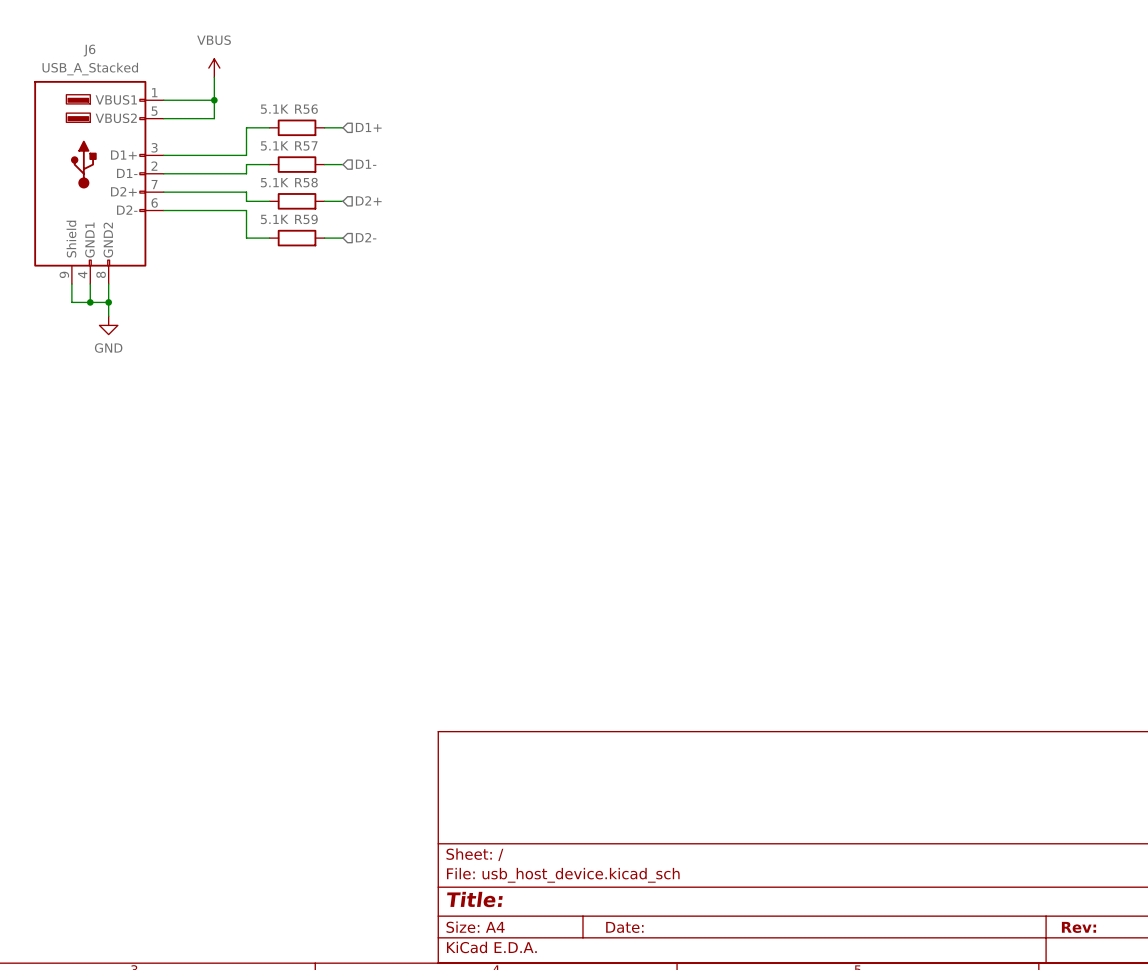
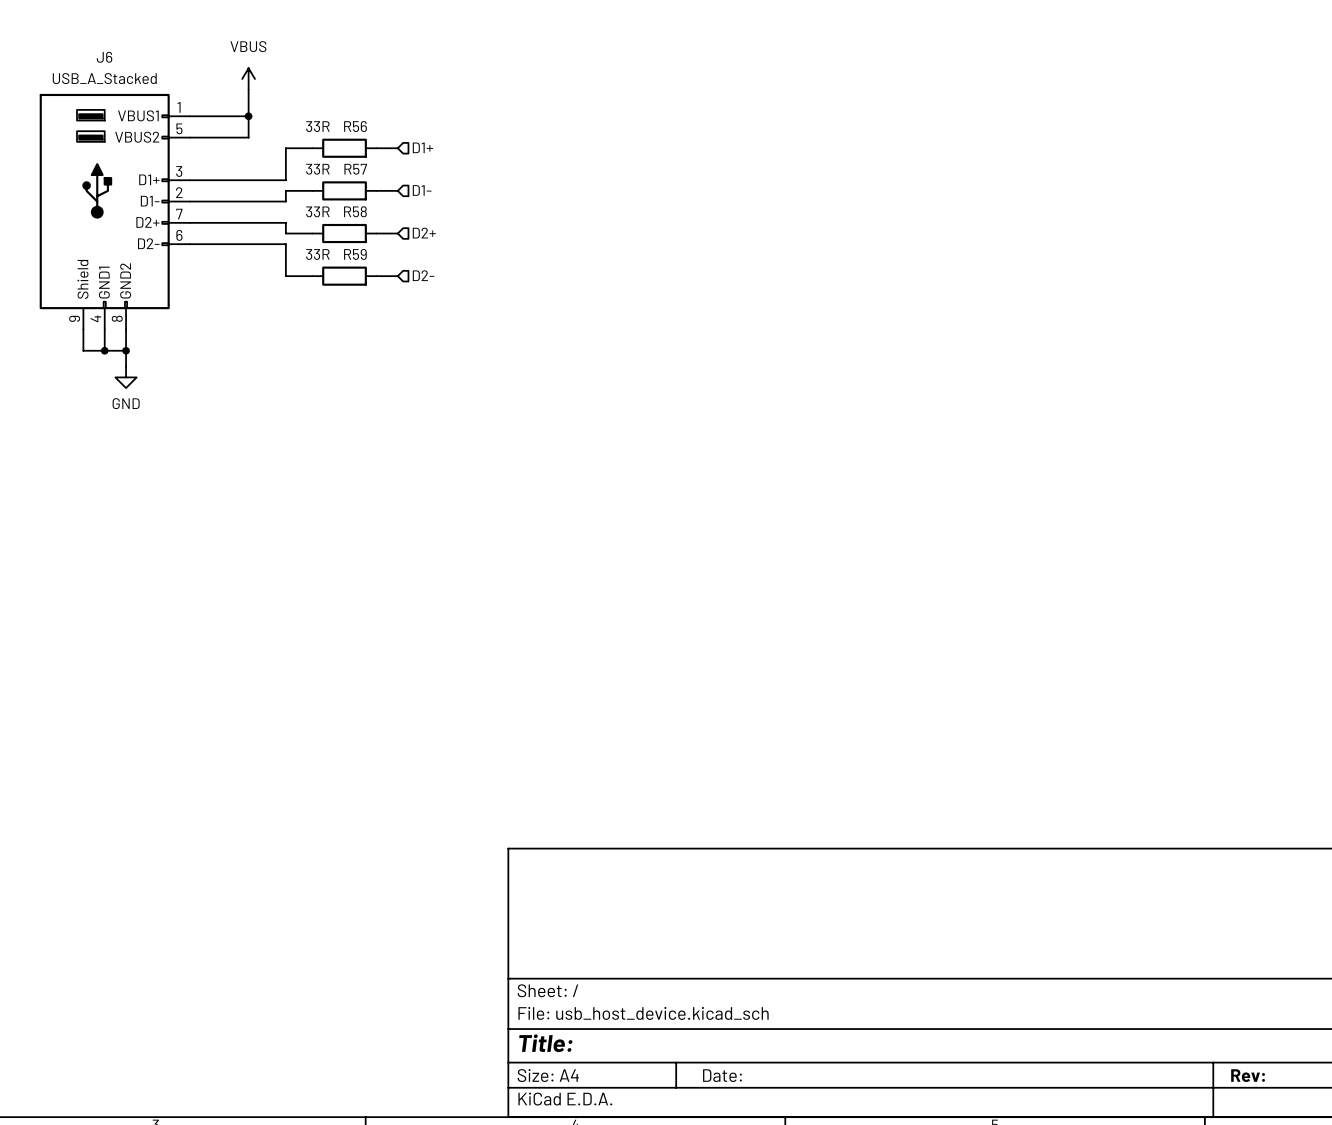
R56 value: 5.1K (274, 109) -> 33R (317, 126)
R57 value: 5.1K (274, 145) -> 33R (317, 169)
R58 value: 5.1K (274, 182) -> 33R (317, 211)
R59 value: 5.1K (274, 219) -> 33R (317, 254)

